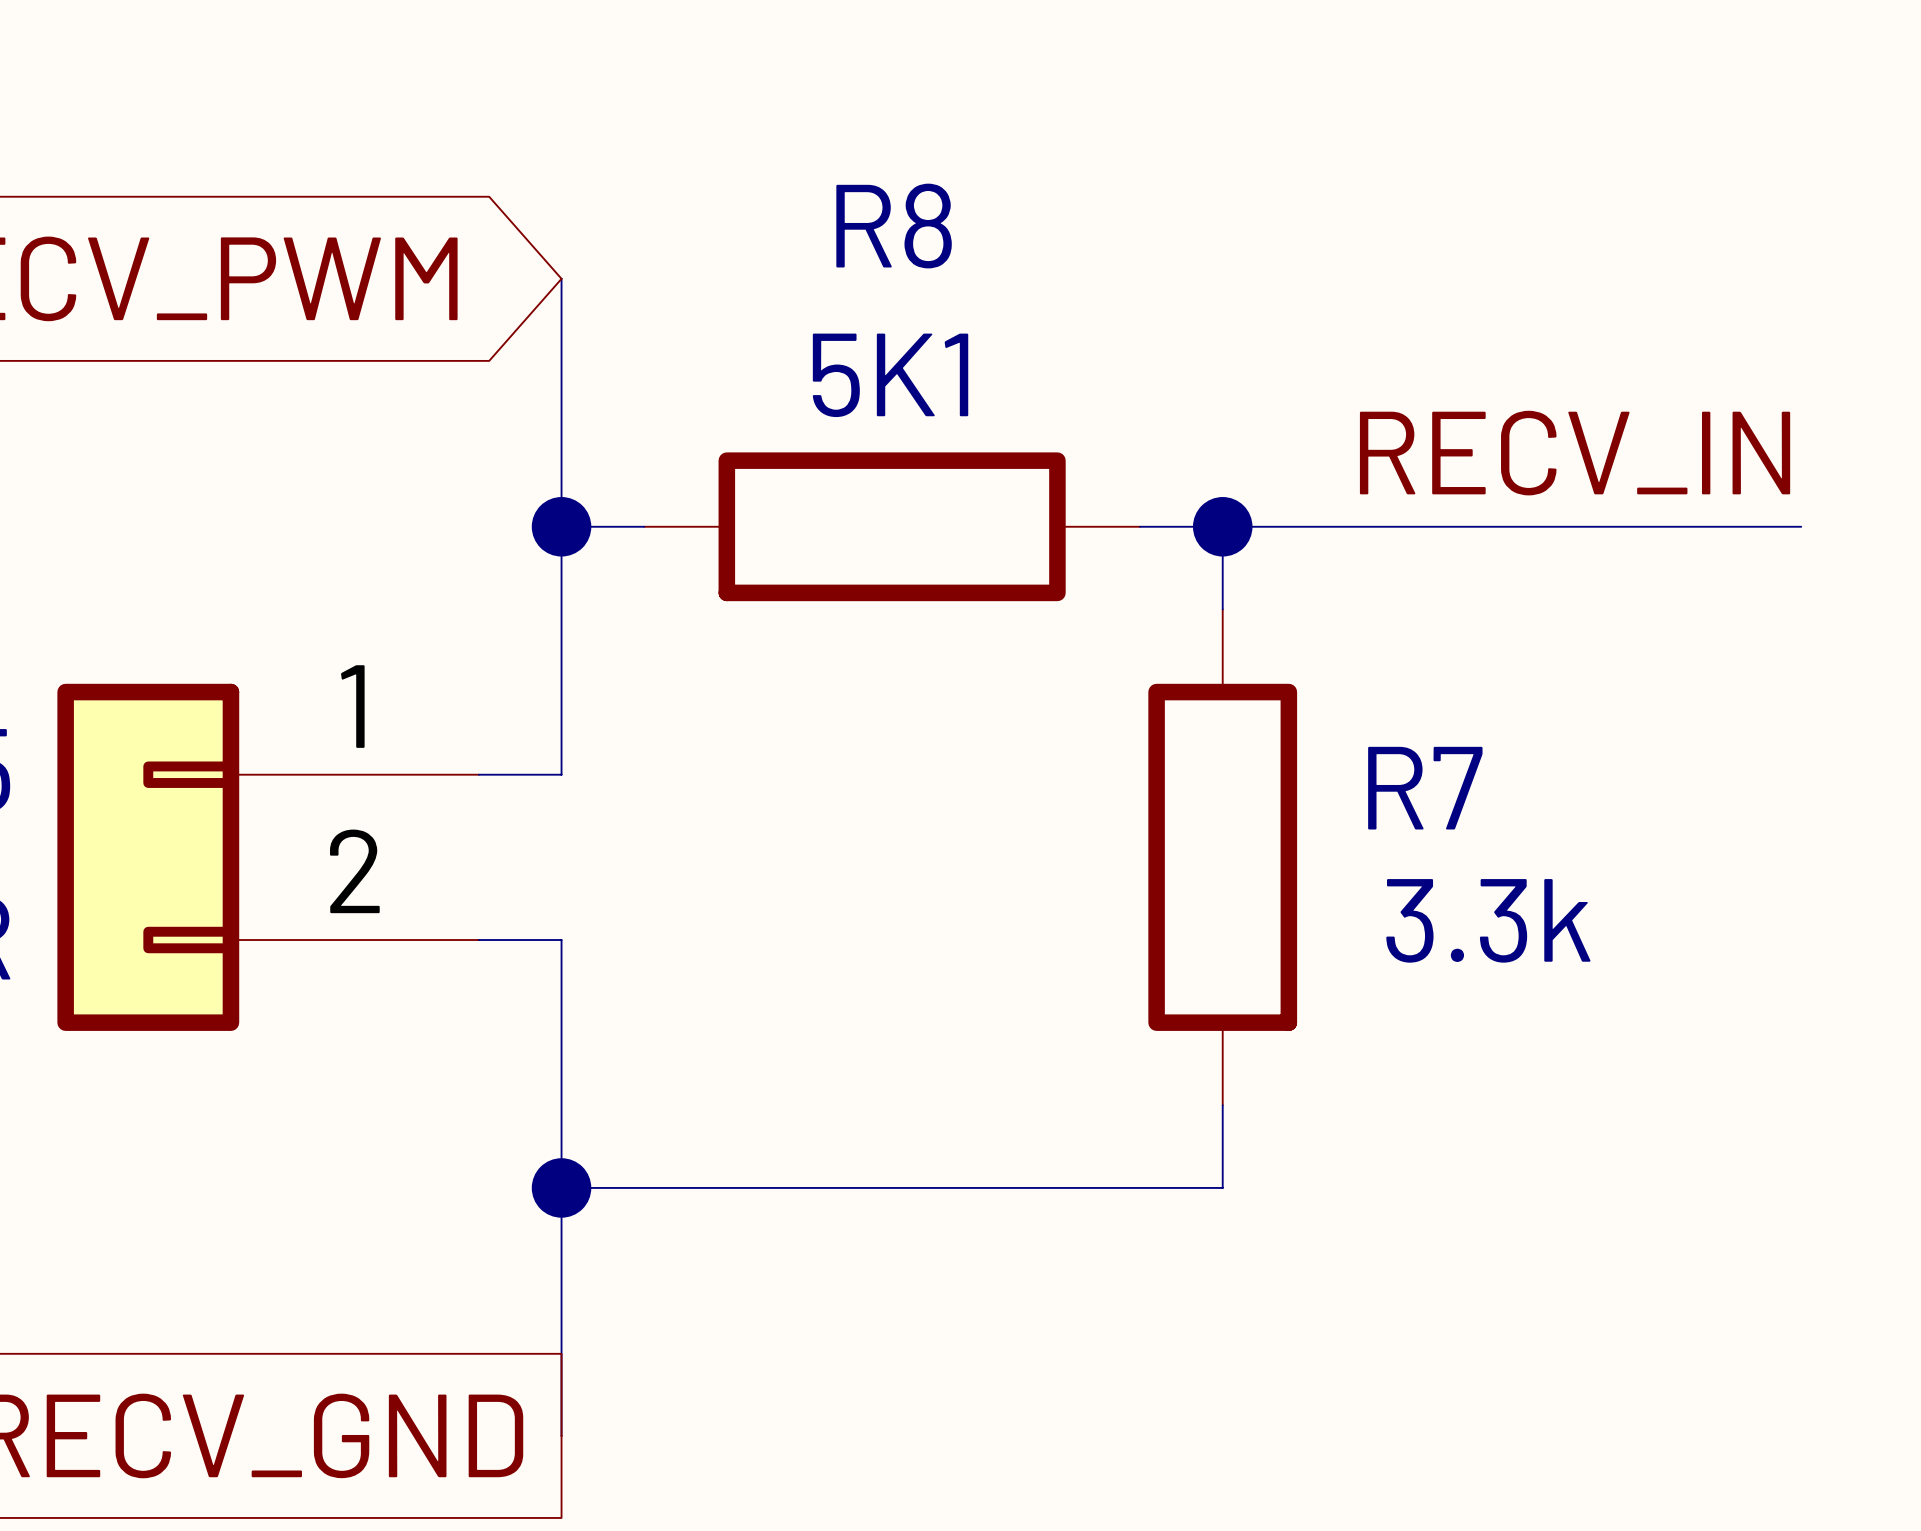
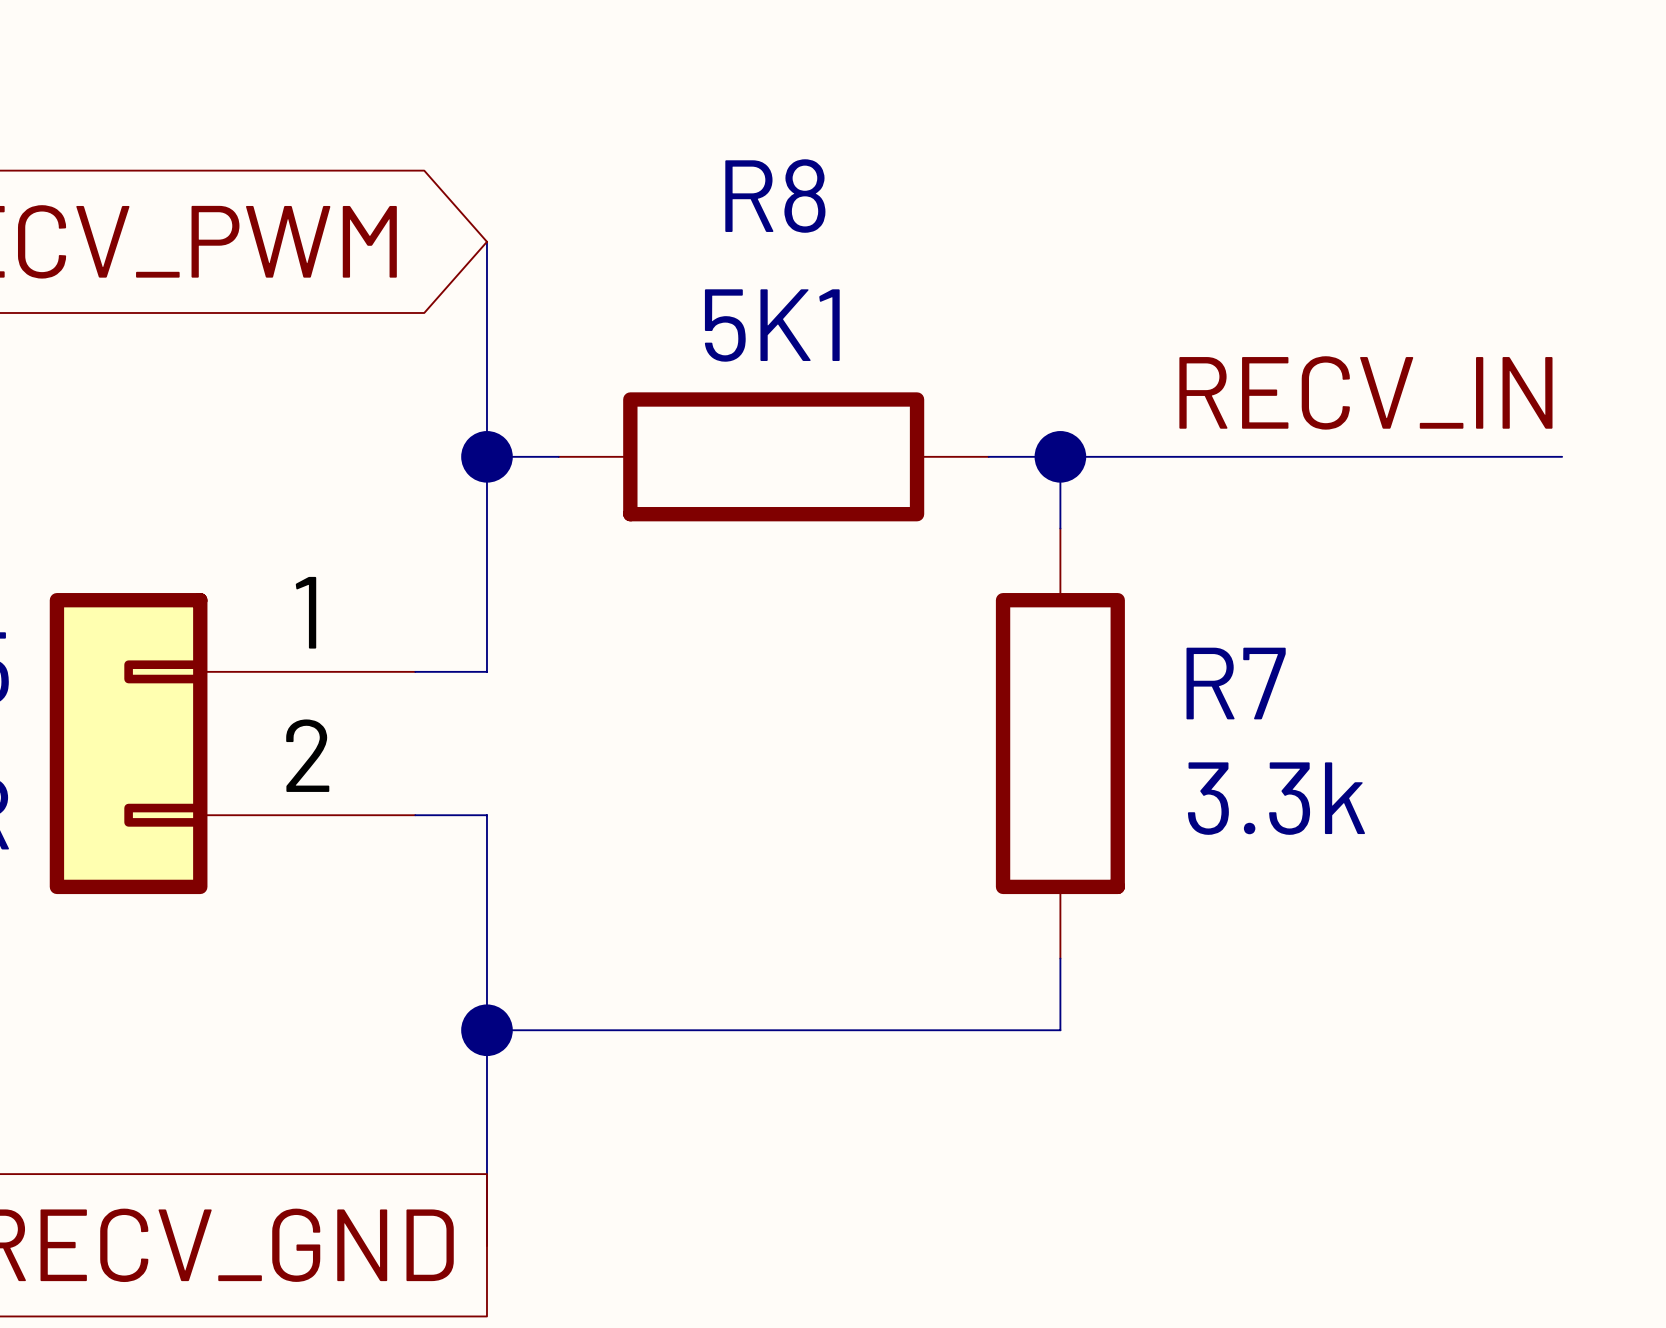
R7 value position: 3.3k (1488, 920) -> 3.3k (1276, 798)

